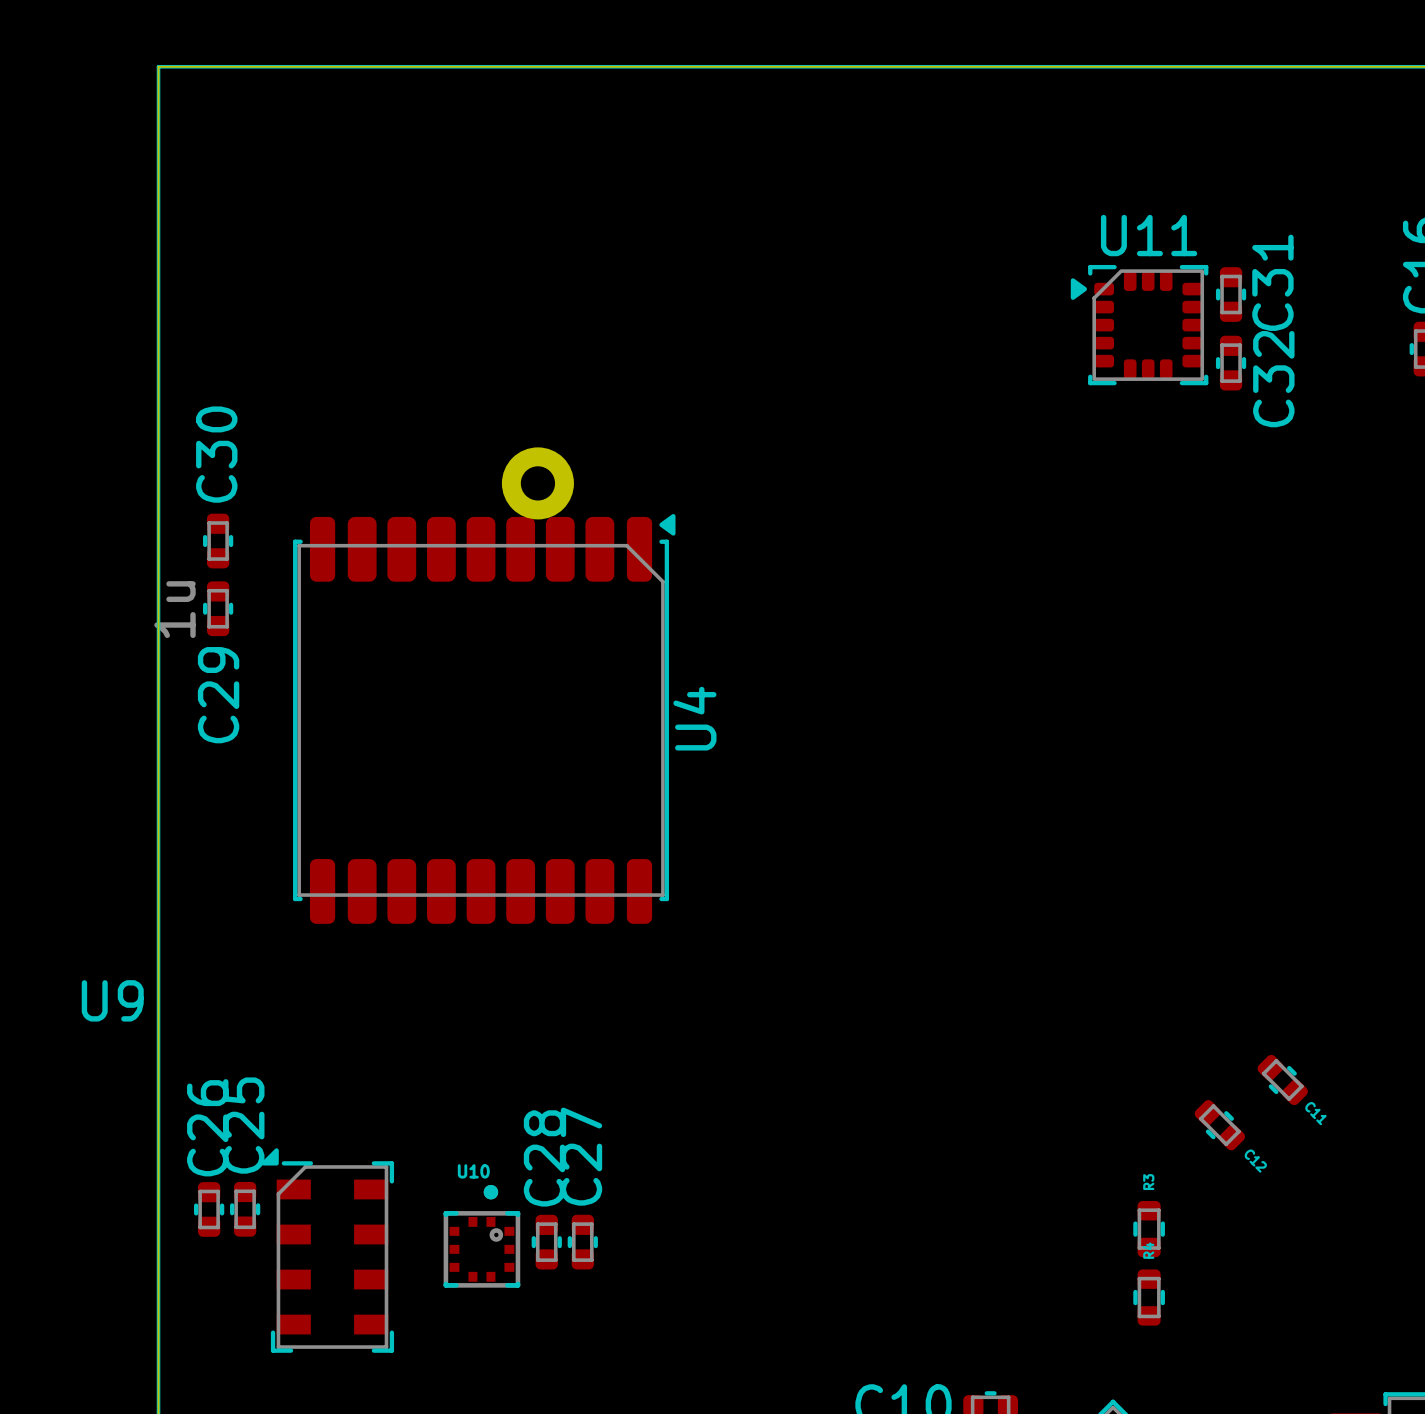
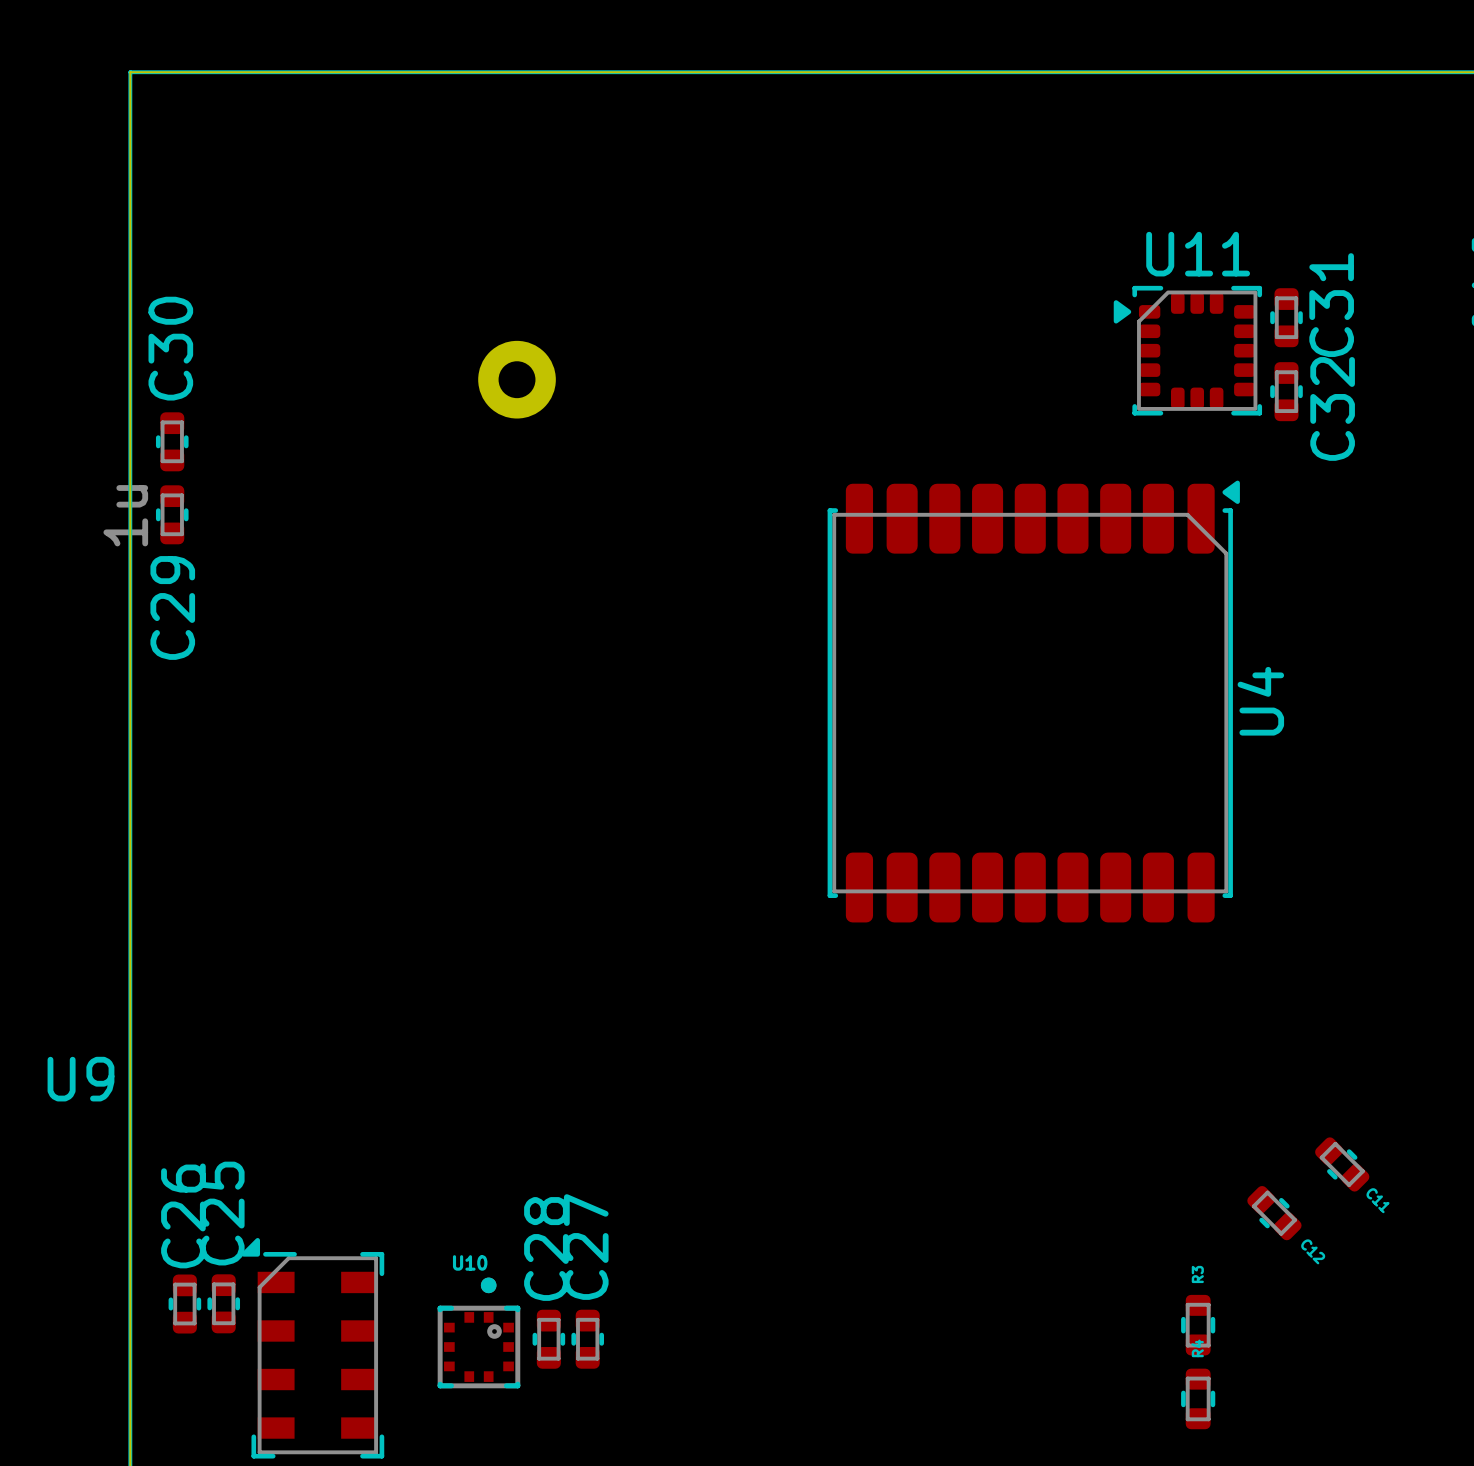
part position: (537, 483) -> (517, 379)
C30 position: (218, 541) -> (172, 441)
C29 position: (218, 608) -> (172, 514)
U4 position: (484, 718) -> (1033, 701)

